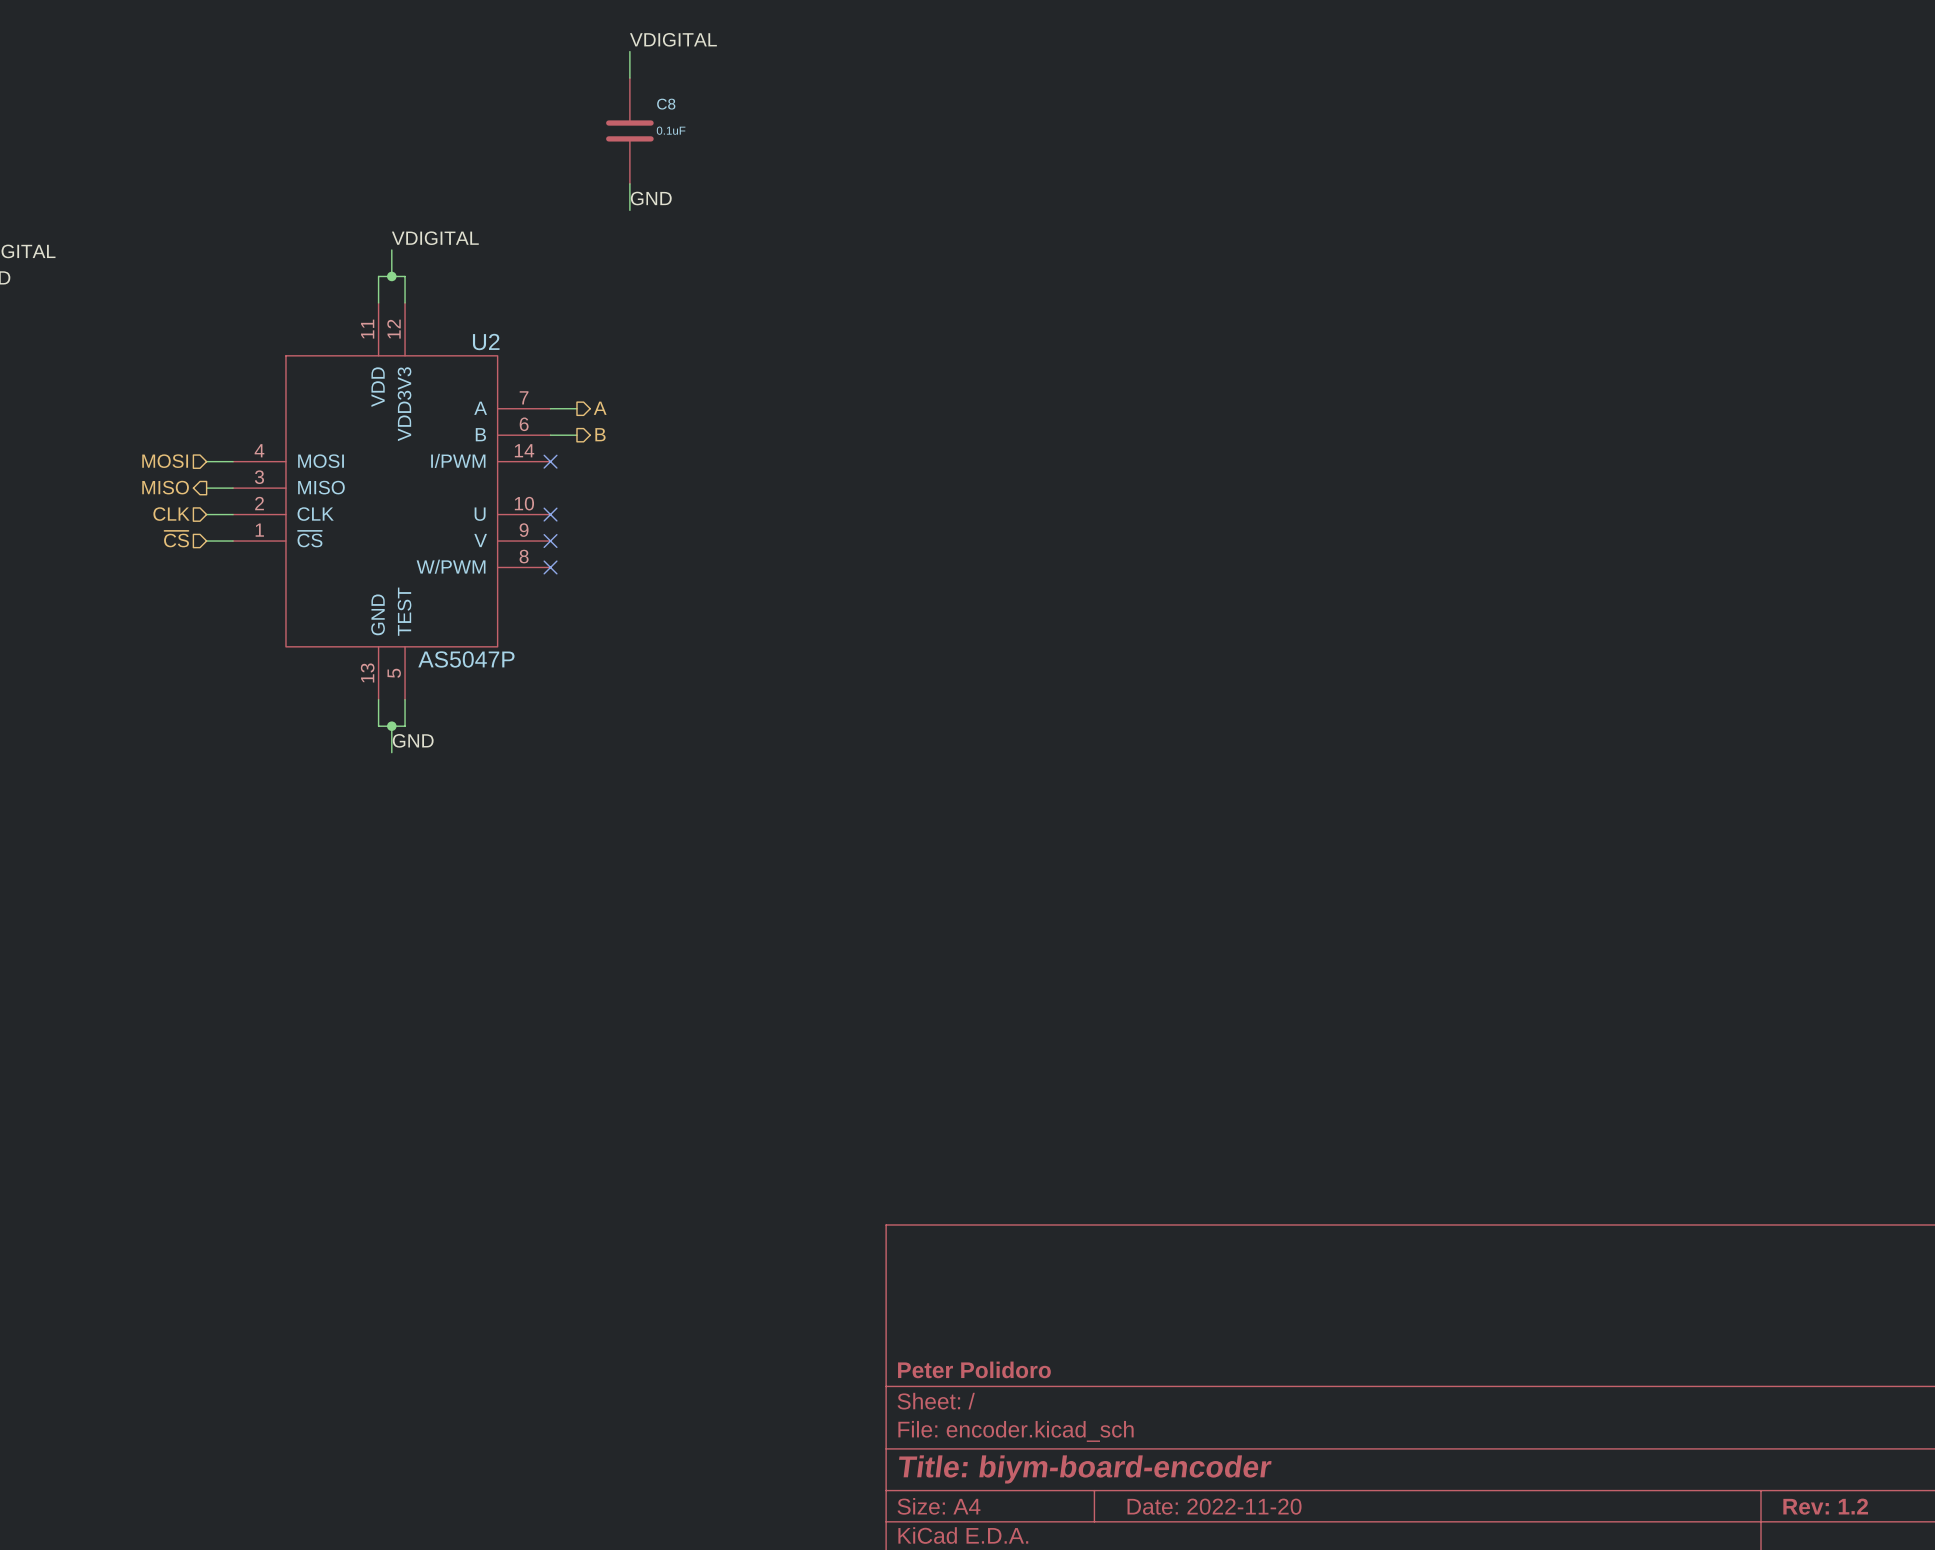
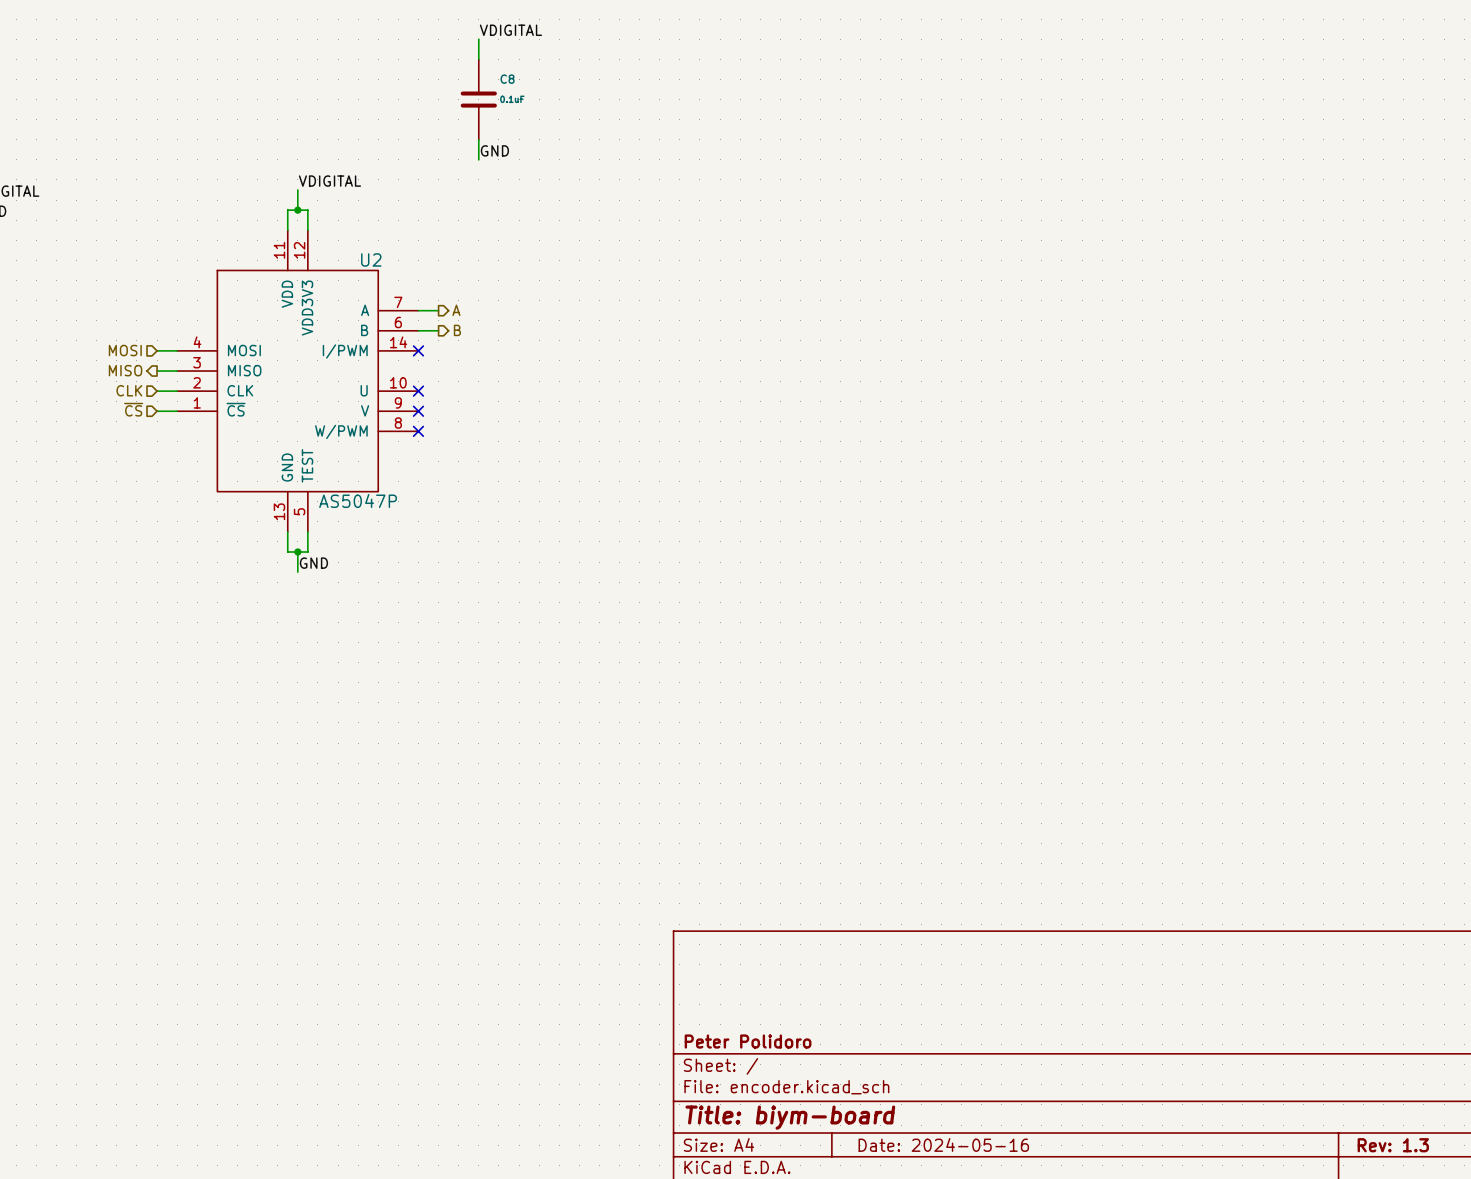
title block: Title: biym-board-encoder (1085, 1469) -> Title: biym-board (790, 1117)
title block: Date: 2022-11-20 (1214, 1506) -> Date: 2024-05-16 (943, 1144)
title block: Rev: 1.2 (1825, 1506) -> Rev: 1.3 (1393, 1145)

